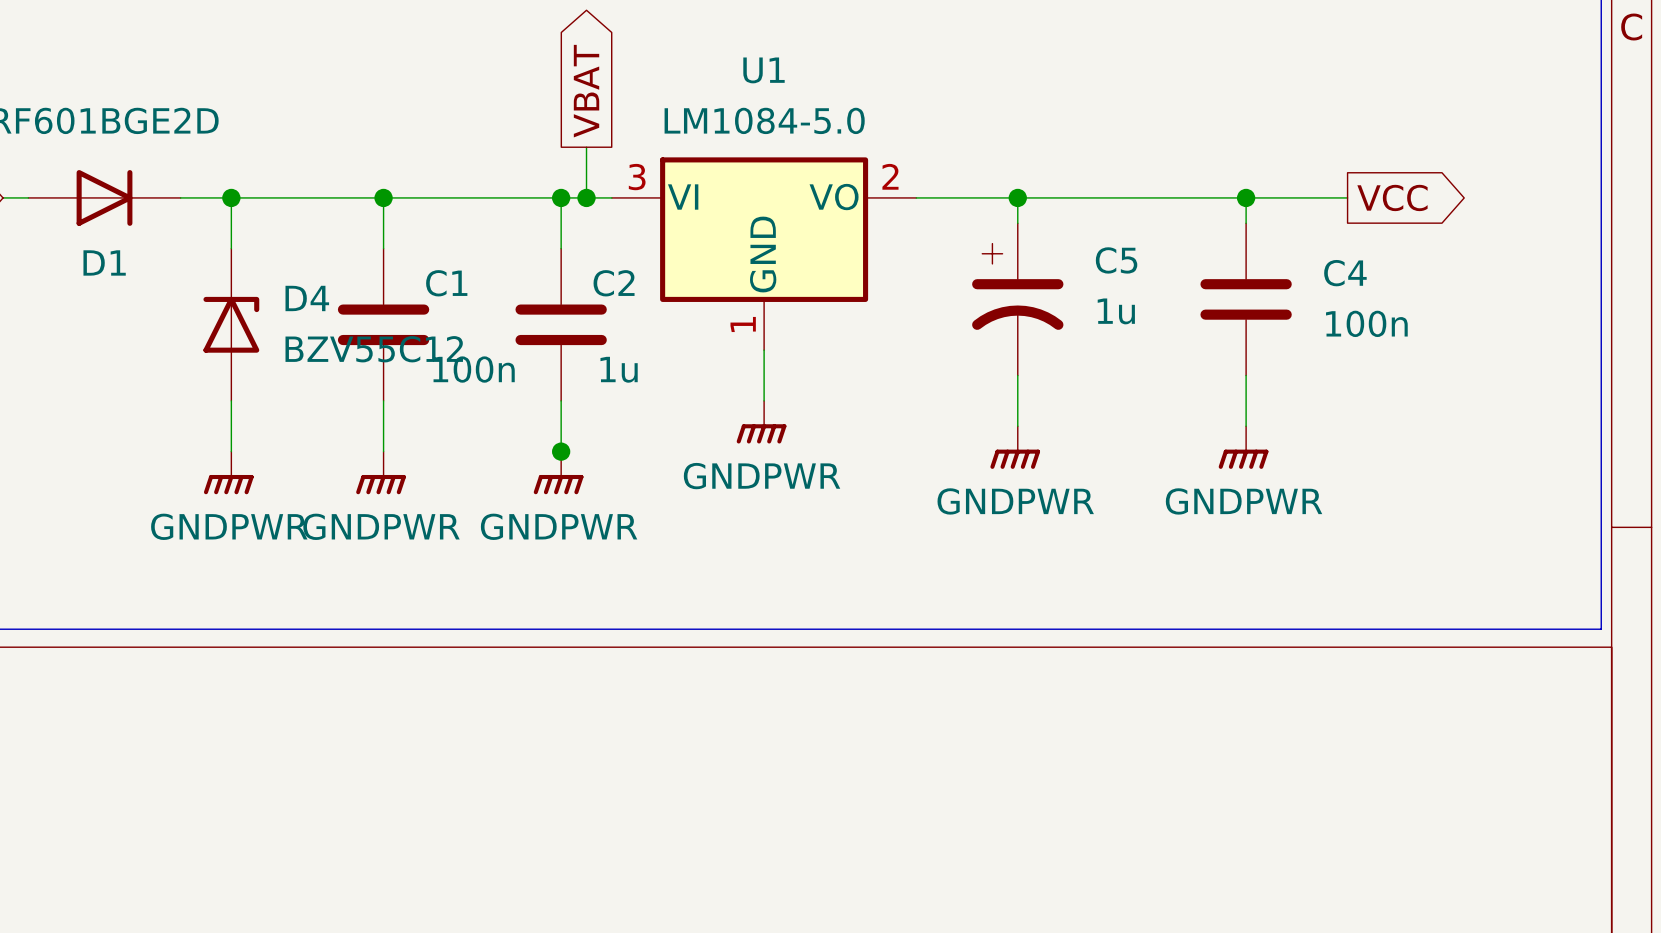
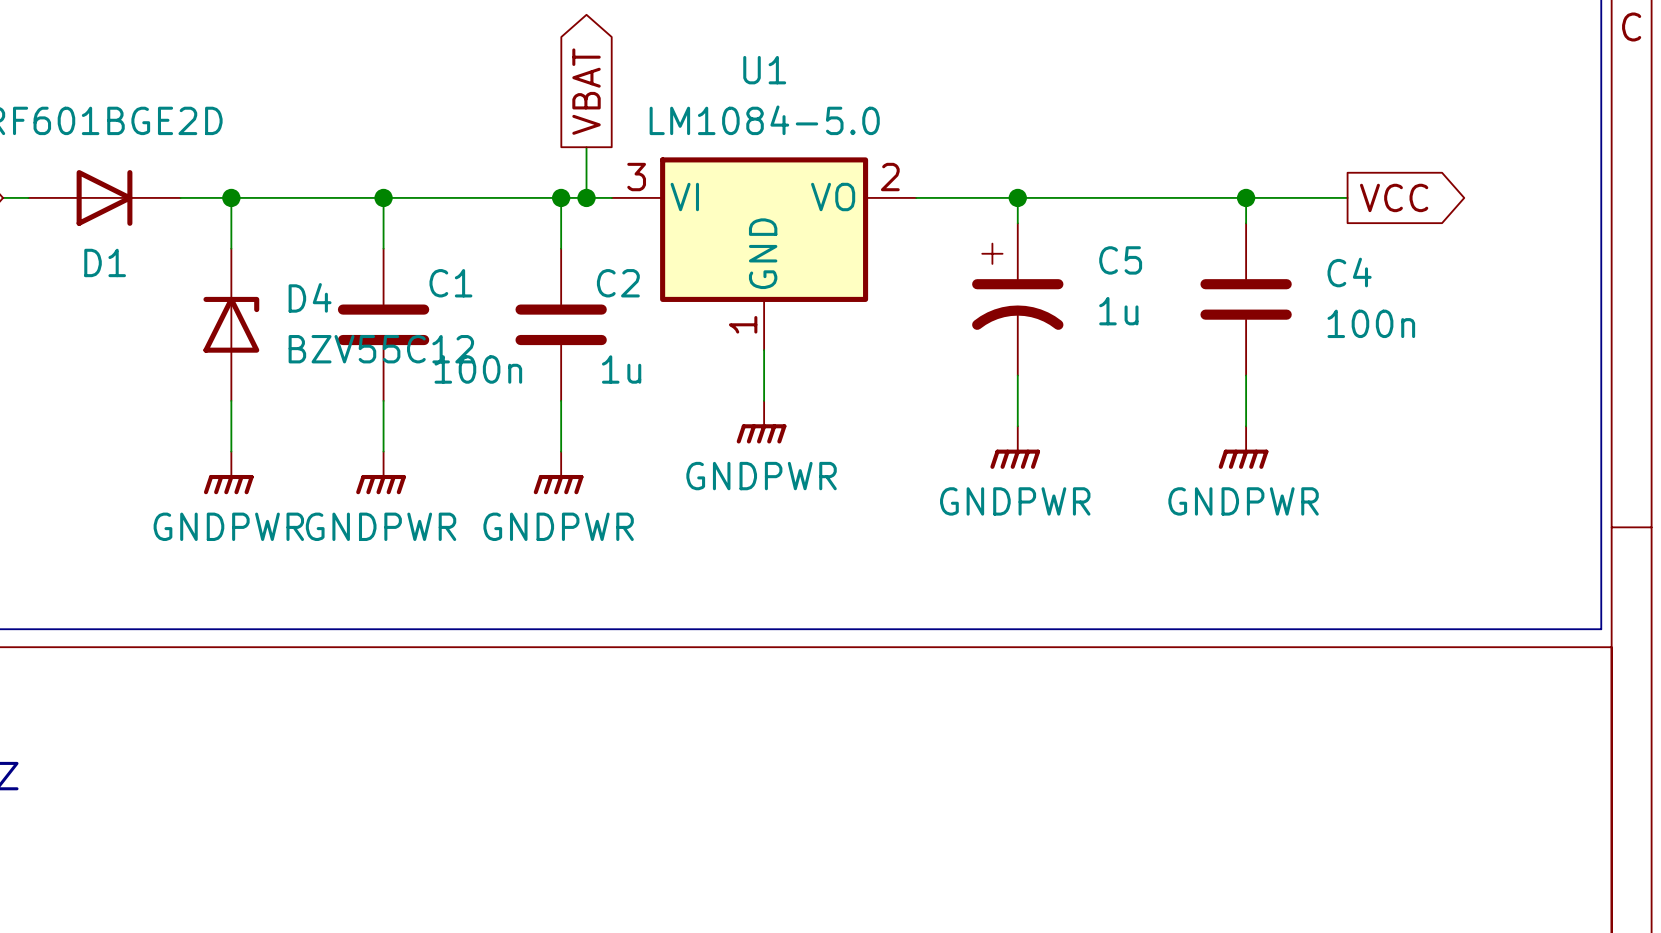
junction: (561, 451) -> none

